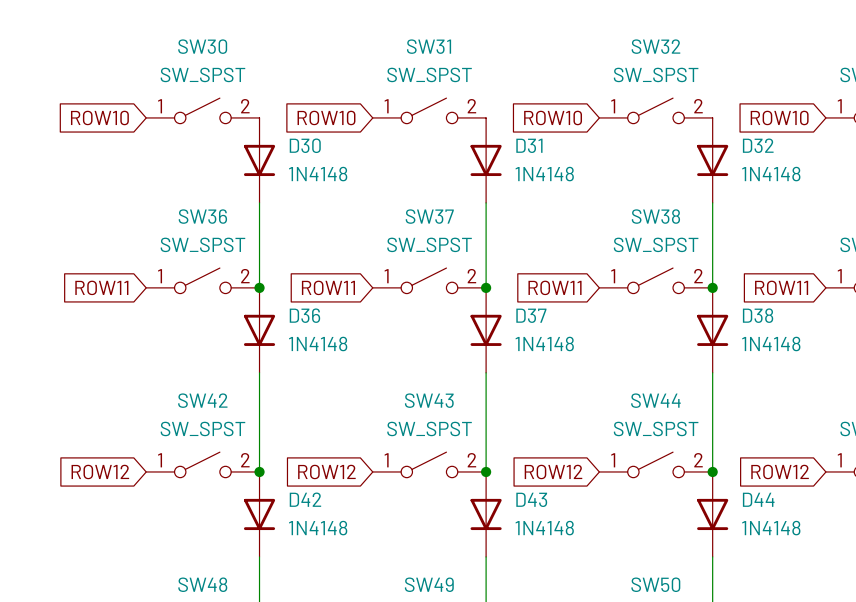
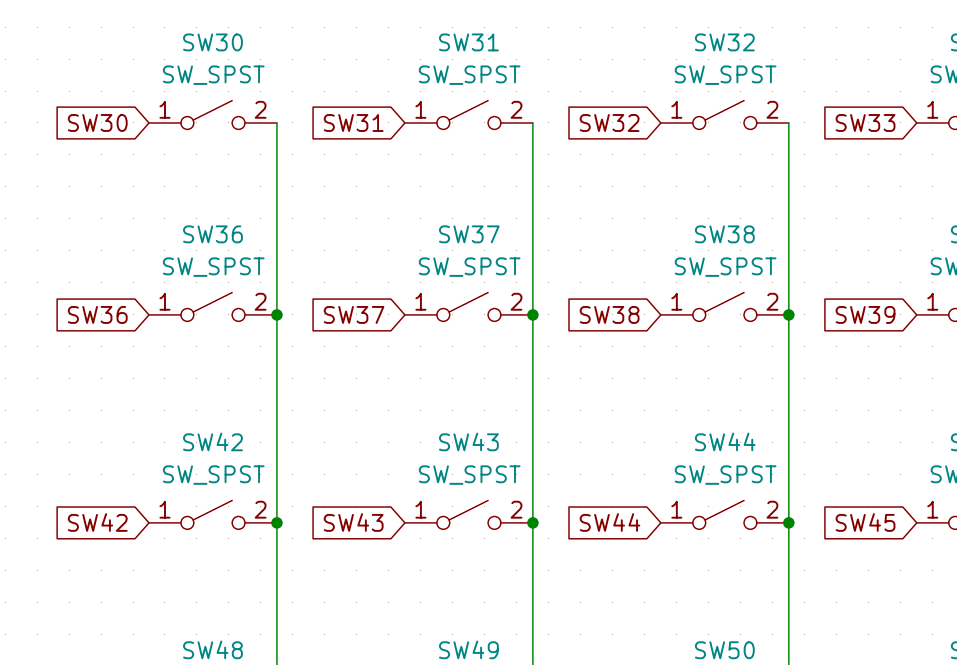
global label: ROW10 (99, 117) -> SW30 (97, 122)
global label: ROW10 (326, 117) -> SW31 (353, 122)
global label: ROW10 (553, 117) -> SW32 (609, 122)
global label: ROW10 (779, 117) -> SW33 (865, 122)
D30: 1N4148 (259, 160) -> none
D31: 1N4148 (486, 160) -> none
D32: 1N4148 (712, 160) -> none
global label: ROW11 (101, 287) -> SW36 (97, 314)
global label: ROW11 (328, 287) -> SW37 (354, 314)
global label: ROW11 (555, 287) -> SW38 (609, 314)
global label: ROW11 (781, 287) -> SW39 (865, 314)
D36: 1N4148 (259, 330) -> none
D37: 1N4148 (486, 330) -> none
D38: 1N4148 (712, 330) -> none
global label: ROW12 (100, 471) -> SW42 (97, 522)
global label: ROW12 (326, 471) -> SW43 (353, 522)
global label: ROW12 (553, 471) -> SW44 (609, 522)
global label: ROW12 (780, 471) -> SW45 (865, 522)
D42: 1N4148 (259, 514) -> none
D43: 1N4148 (486, 514) -> none
D44: 1N4148 (712, 514) -> none

